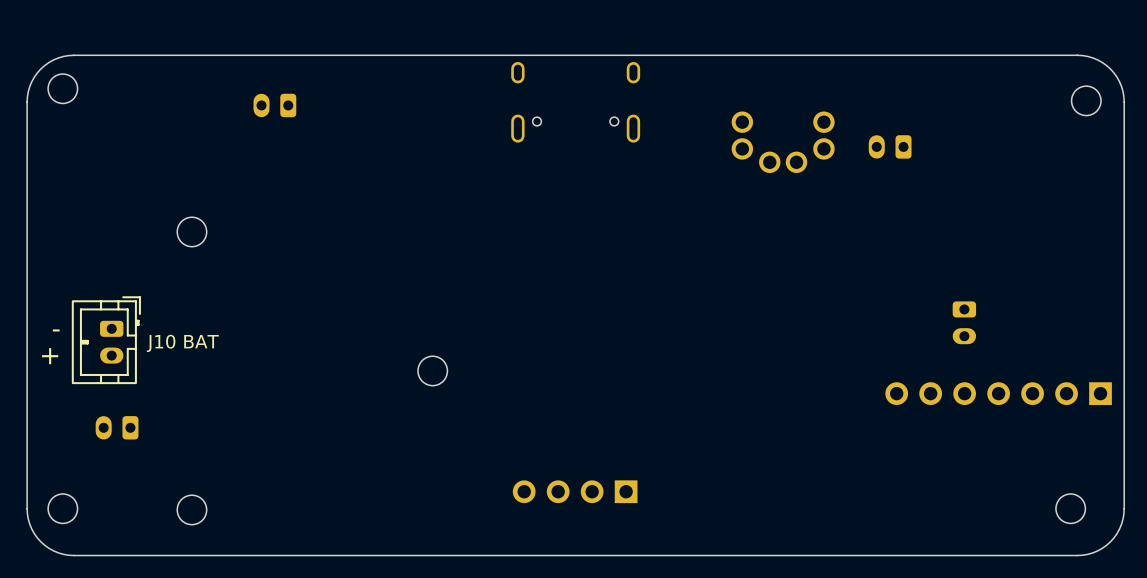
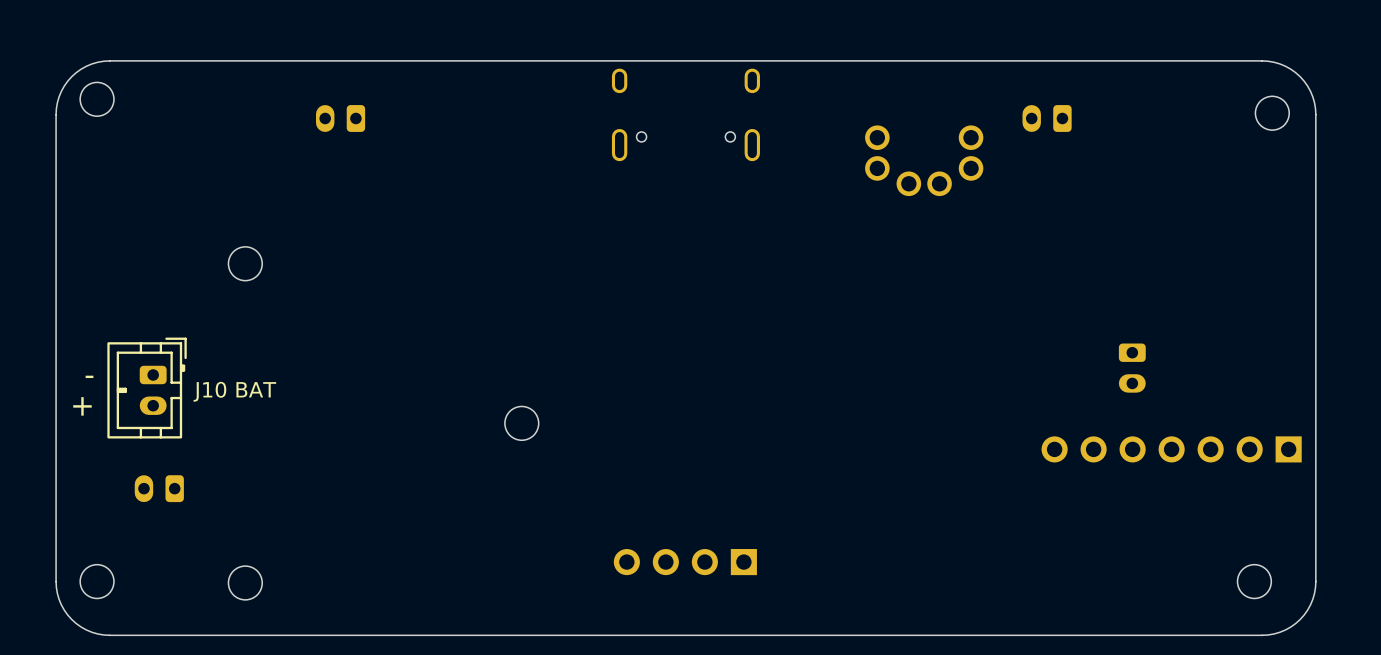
part position: (890, 146) -> (1047, 118)

